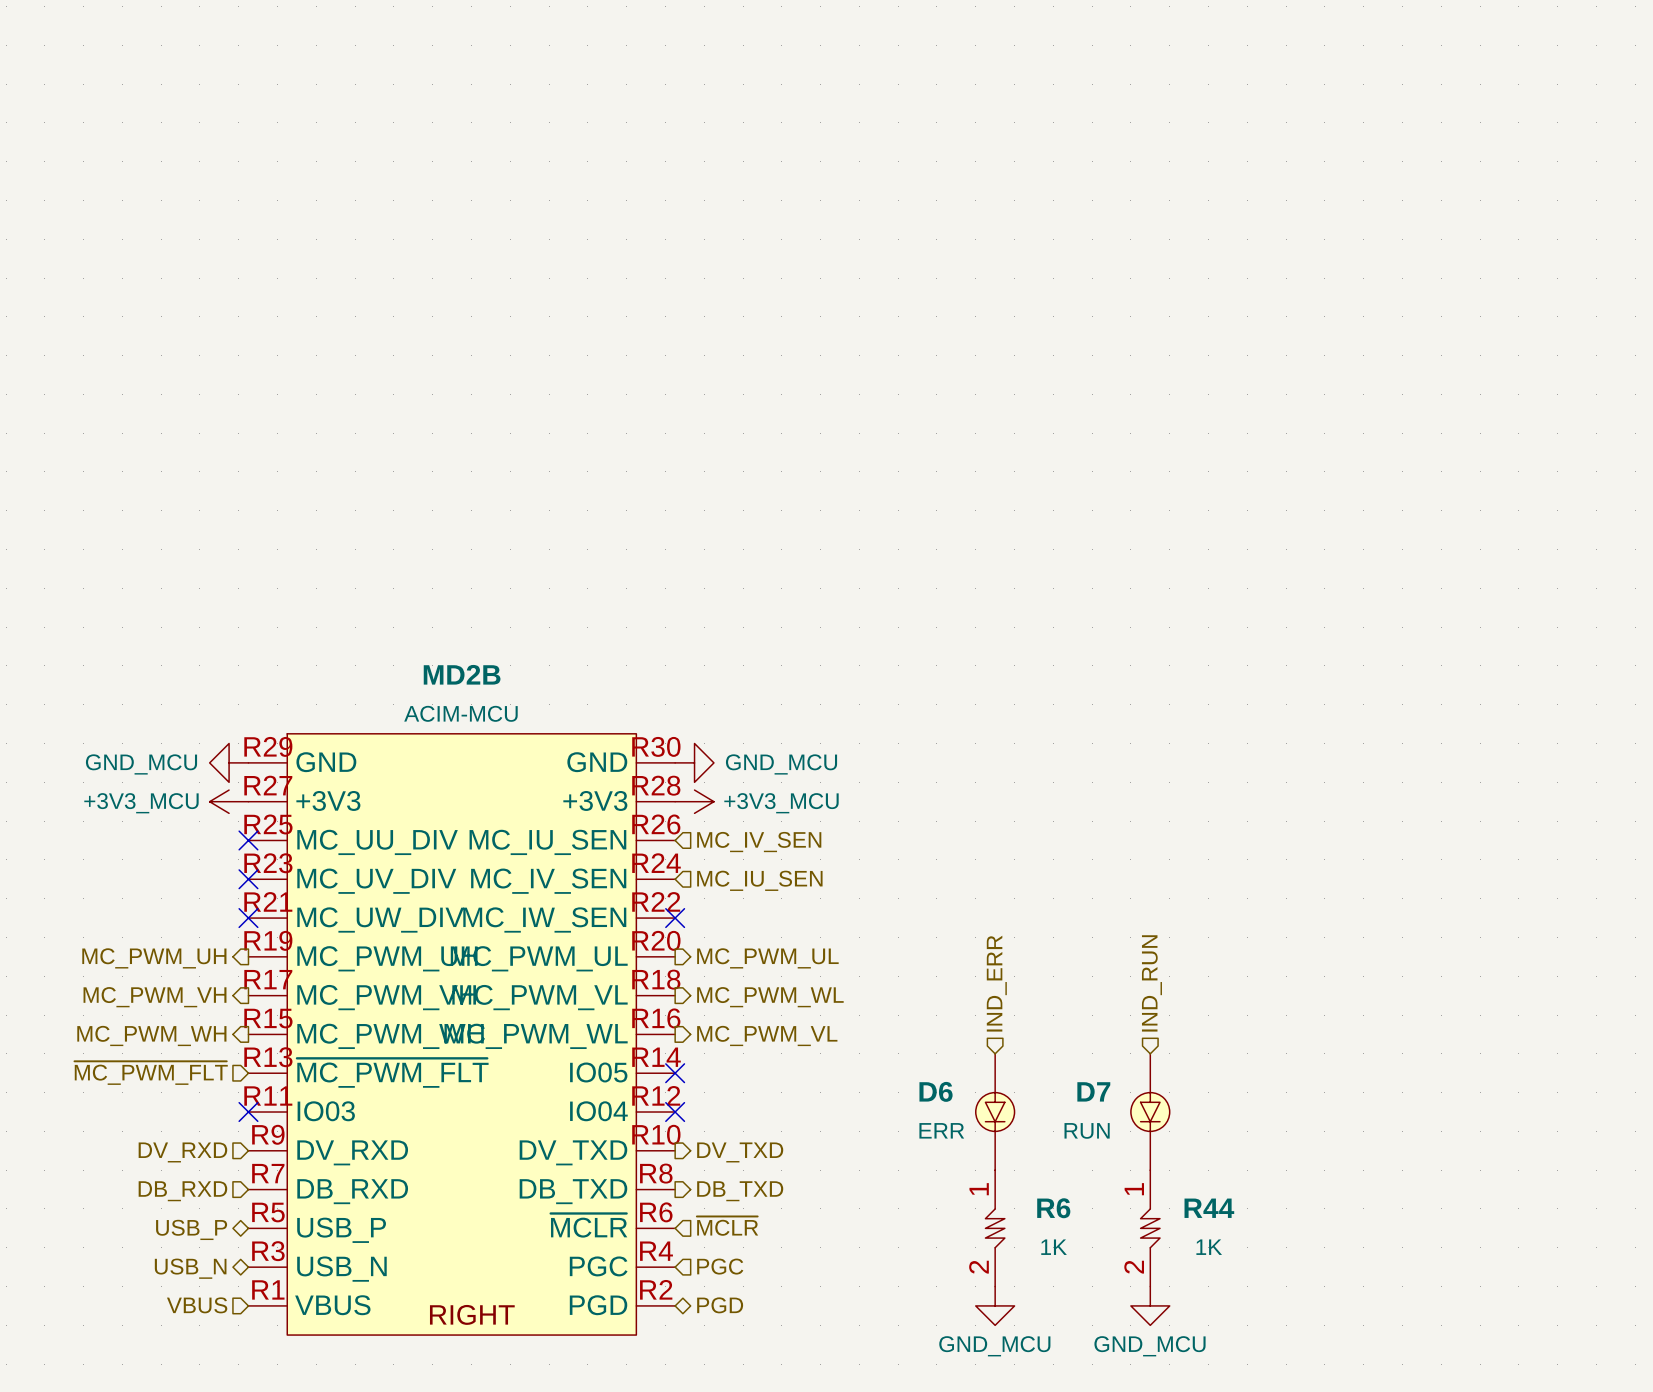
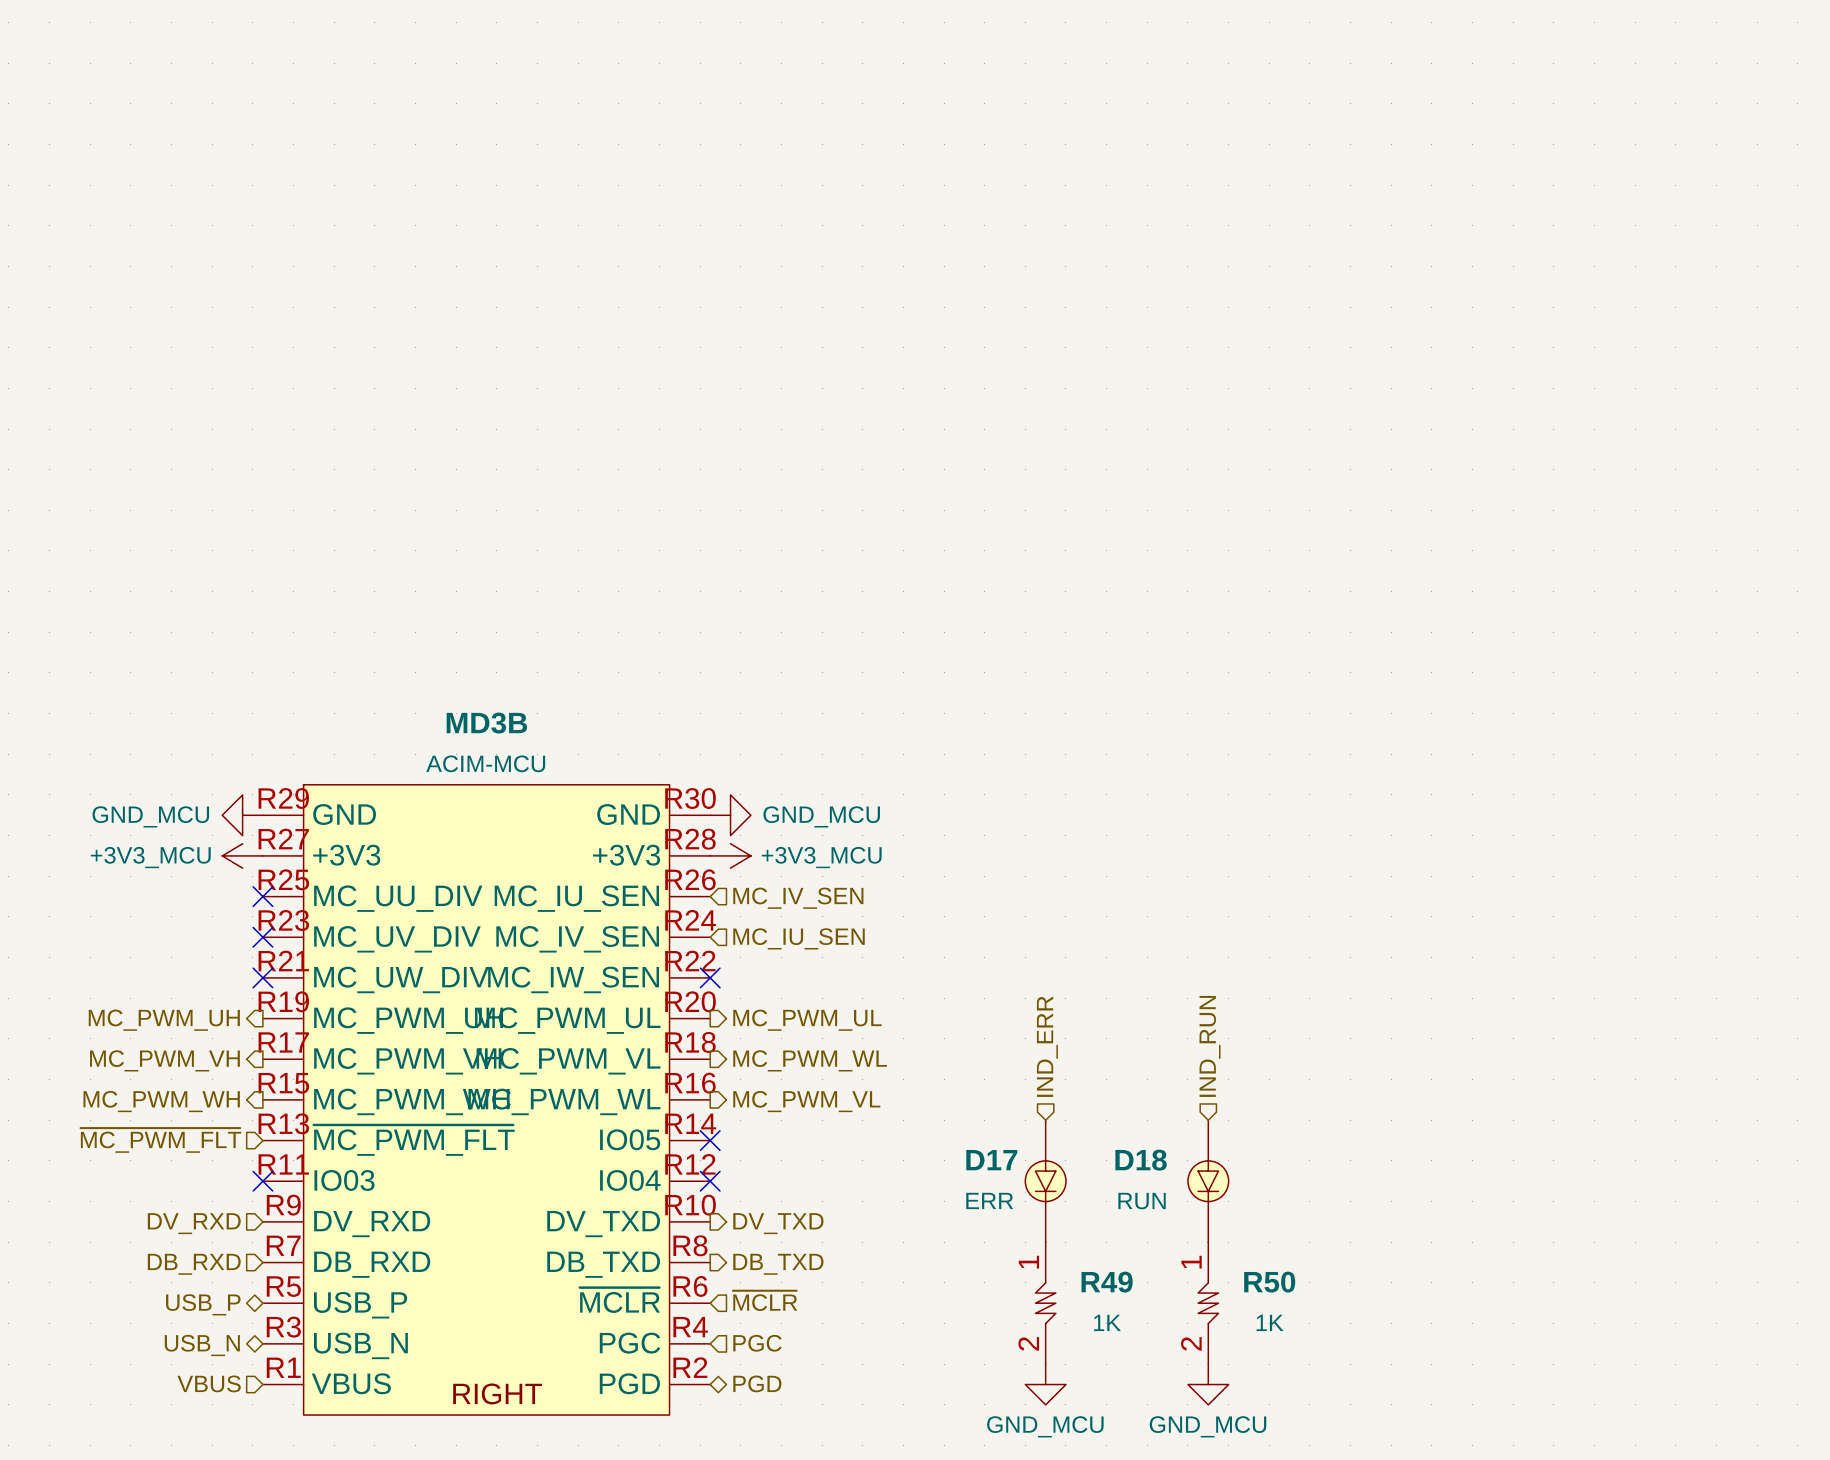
MD2B name: MD2B (462, 674) -> MD3B (486, 723)
D6 name: D6 (936, 1091) -> D17 (991, 1160)
D7 name: D7 (1093, 1091) -> D18 (1141, 1160)
R6 name: R6 (1053, 1208) -> R49 (1107, 1282)
R44 name: R44 (1209, 1208) -> R50 (1269, 1282)

